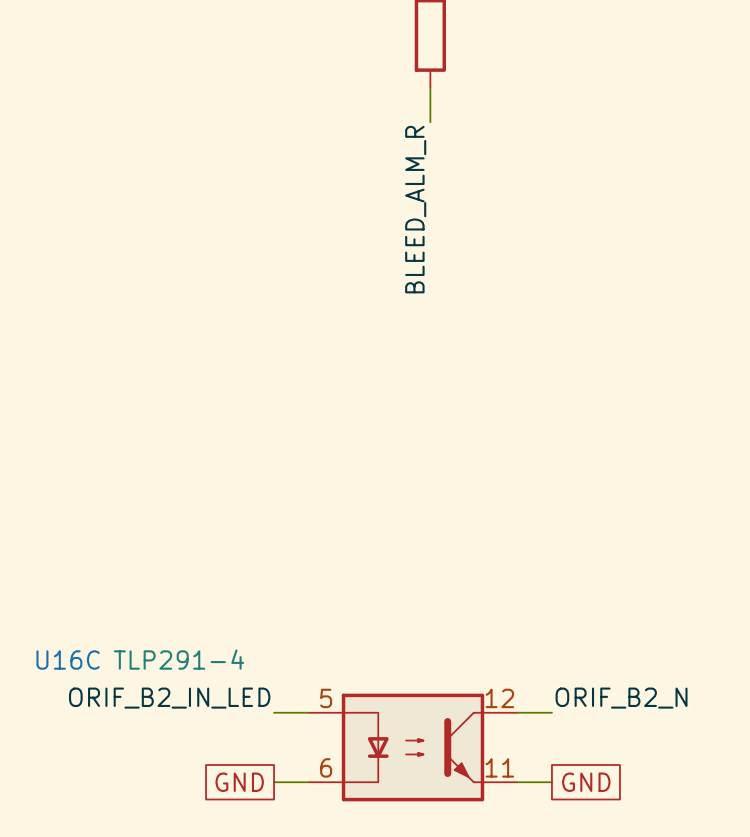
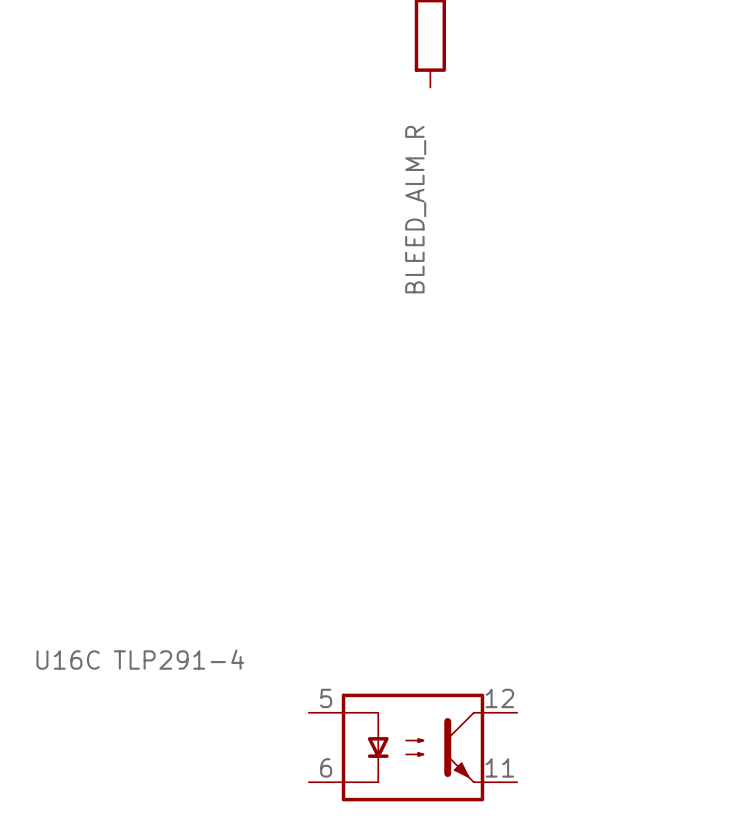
wire: (430, 87) (430, 122) -> none
label: ORIF_B2_IN_LED (169, 698) -> none
label: ORIF_B2_N (621, 698) -> none
wire: (274, 712) (308, 712) -> none
wire: (517, 712) (551, 712) -> none
global label: GND (239, 782) -> none
wire: (274, 782) (308, 782) -> none
wire: (517, 782) (551, 782) -> none
global label: GND (586, 782) -> none

